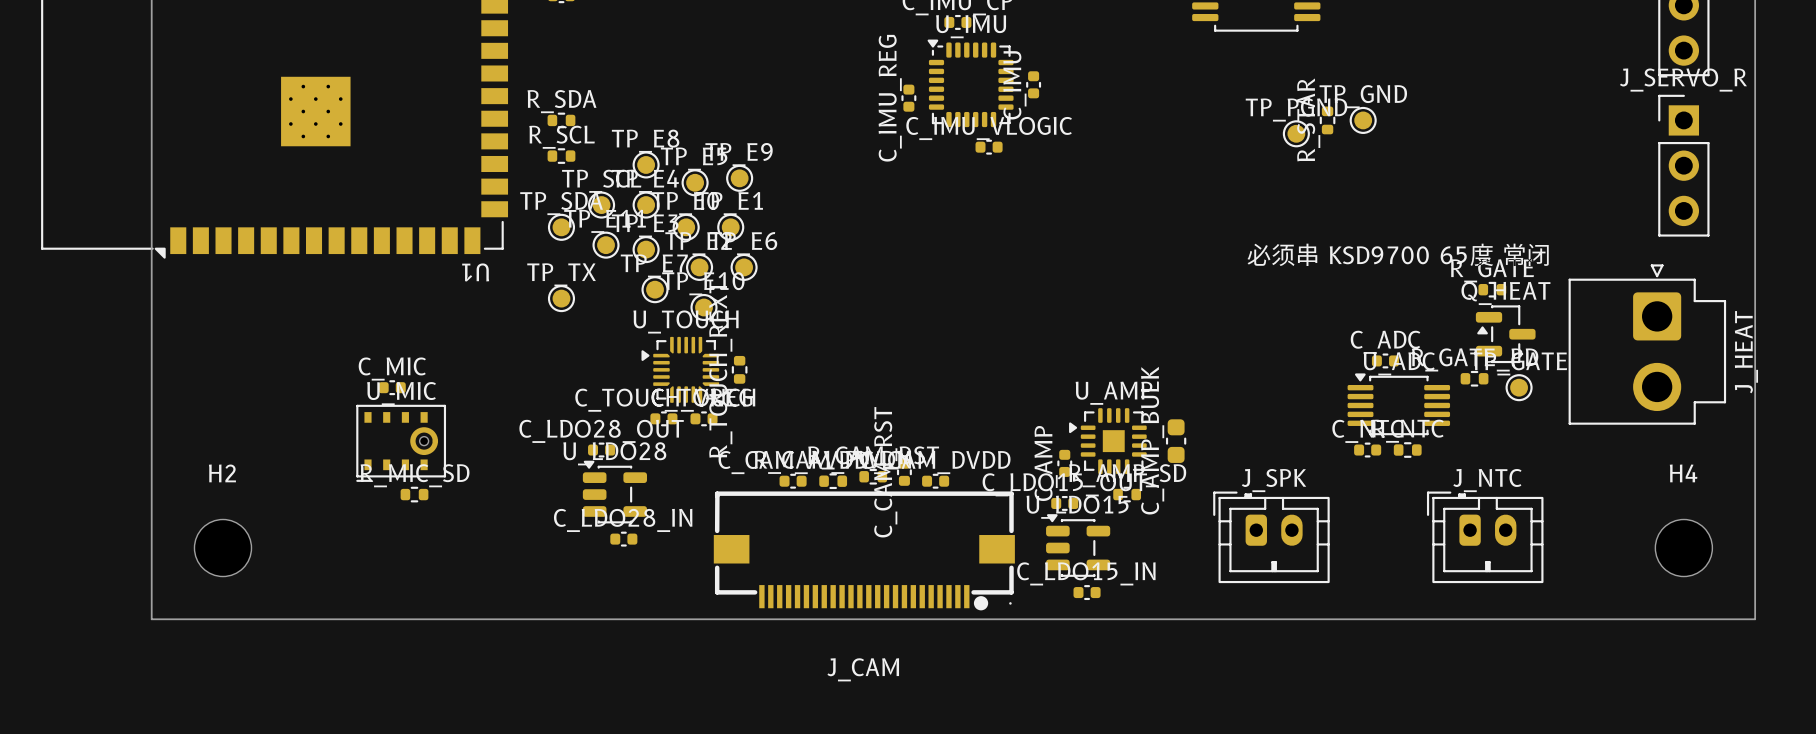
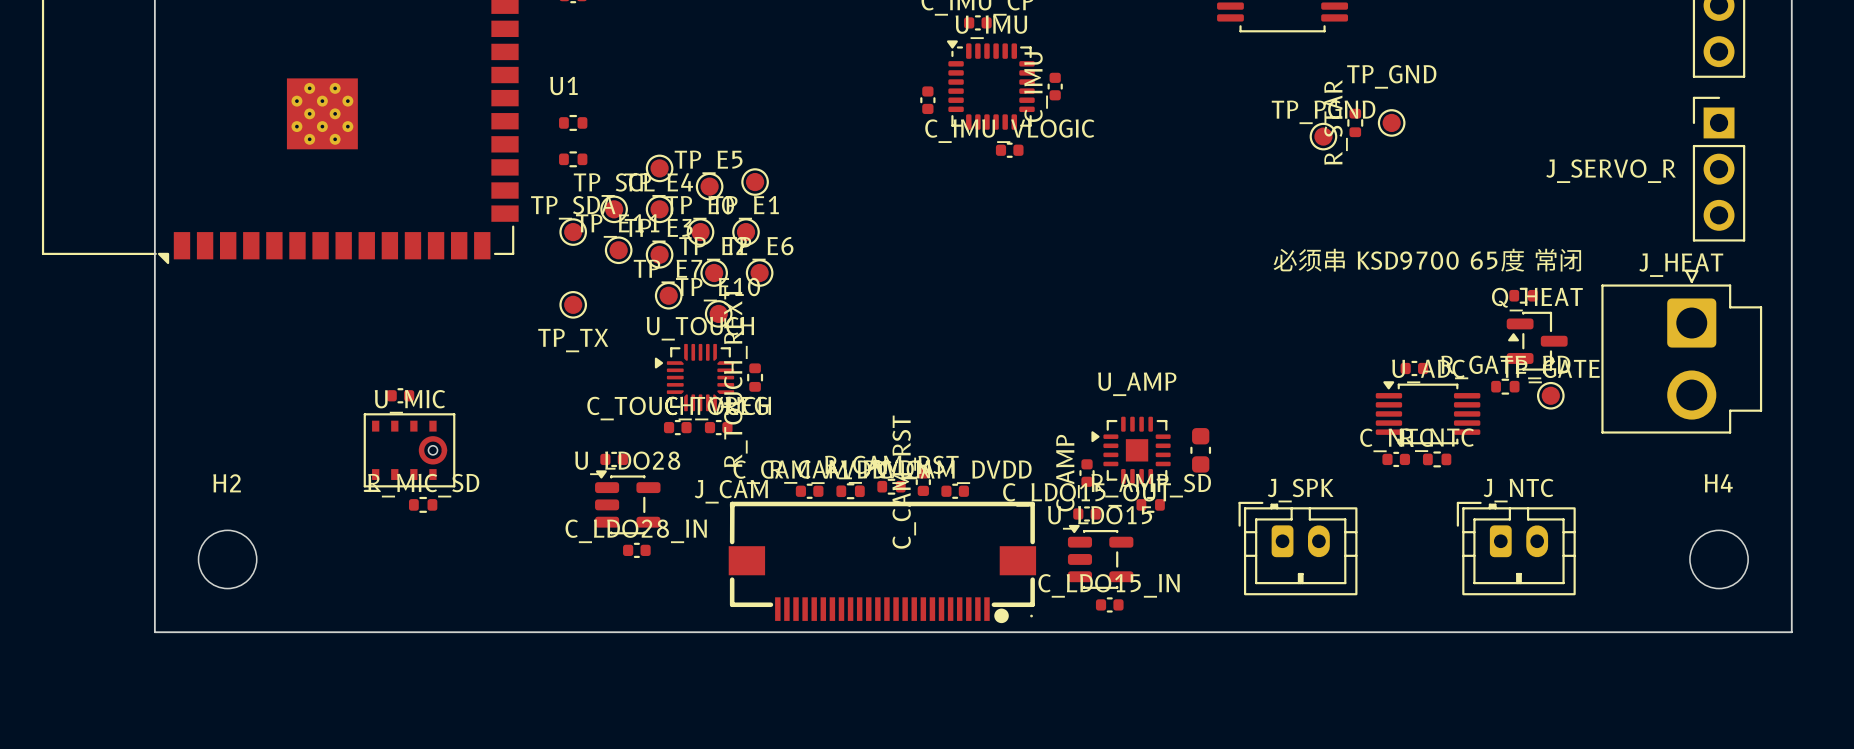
J_SERVO_R name position: J_SERVO_R (1683, 80) -> J_SERVO_R (1611, 171)
TP_GND name position: TP_GND (1363, 96) -> TP_GND (1391, 76)
C_IMU_REG name: C_IMU_REG (890, 98) -> none
R_SDA name: R_SDA (562, 101) -> none
R_SCL name: R_SCL (562, 137) -> none
TP_E8 name: TP_E8 (645, 141) -> none
TP_E9 name: TP_E9 (739, 154) -> none
R_GATE name: R_GATE (1492, 270) -> none
U1 name rotation: 0° (475, 272) -> 180° (563, 85)
U1 name position: U1 (475, 272) -> U1 (563, 85)
TP_TX name position: TP_TX (561, 274) -> TP_TX (573, 340)
C_ADC name: C_ADC (1385, 342) -> none
J_HEAT name rotation: 0° (1746, 352) -> 90° clockwise (1681, 265)
J_HEAT name position: J_HEAT (1746, 352) -> J_HEAT (1681, 265)
C_MIC name: C_MIC (392, 369) -> none
U_AMP name position: U_AMP (1114, 393) -> U_AMP (1137, 384)
C_LDO28_OUT name: C_LDO28_OUT (601, 431) -> none
C_AMP_BULK name: C_AMP_BULK (1152, 440) -> none
J_CAM name position: J_CAM (863, 669) -> J_CAM (731, 491)

